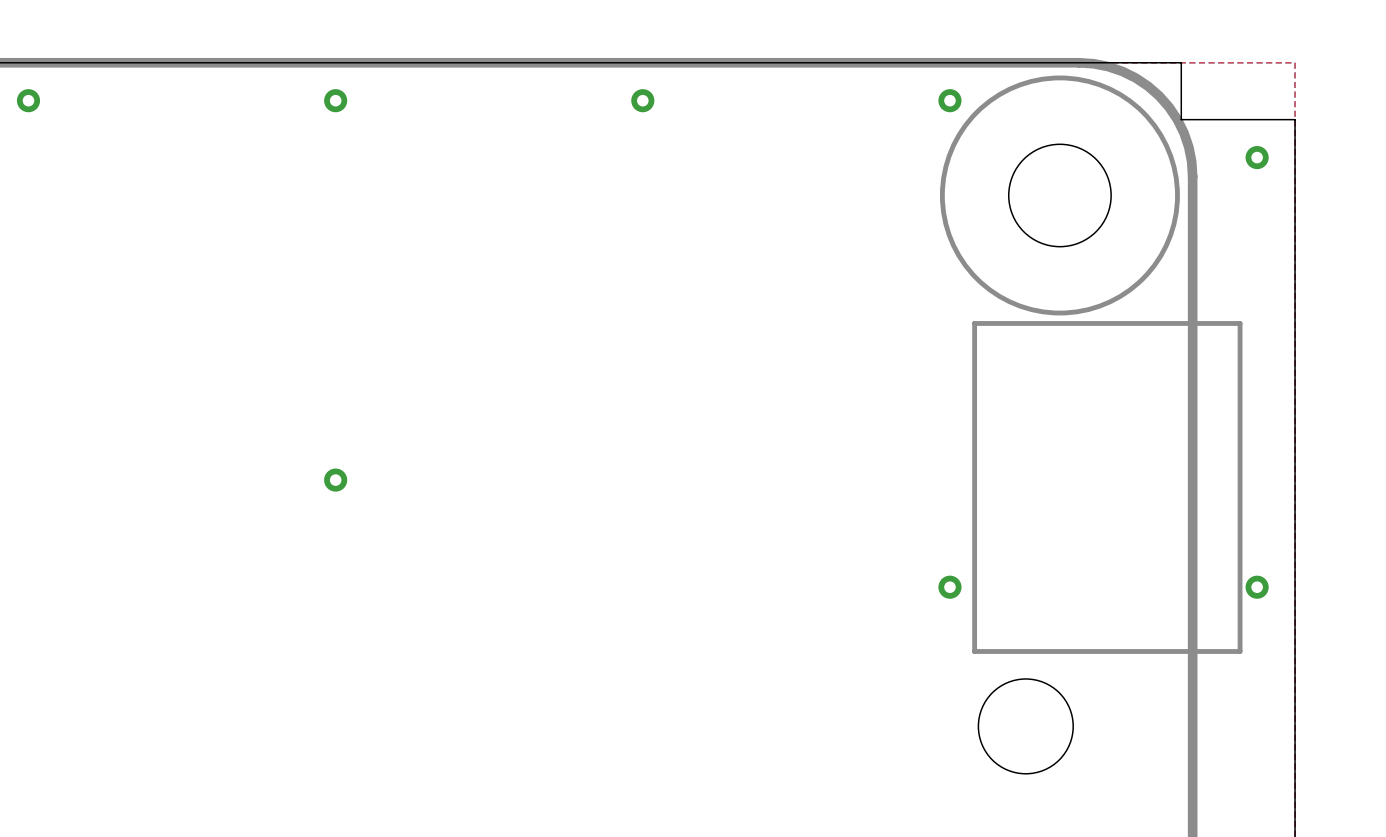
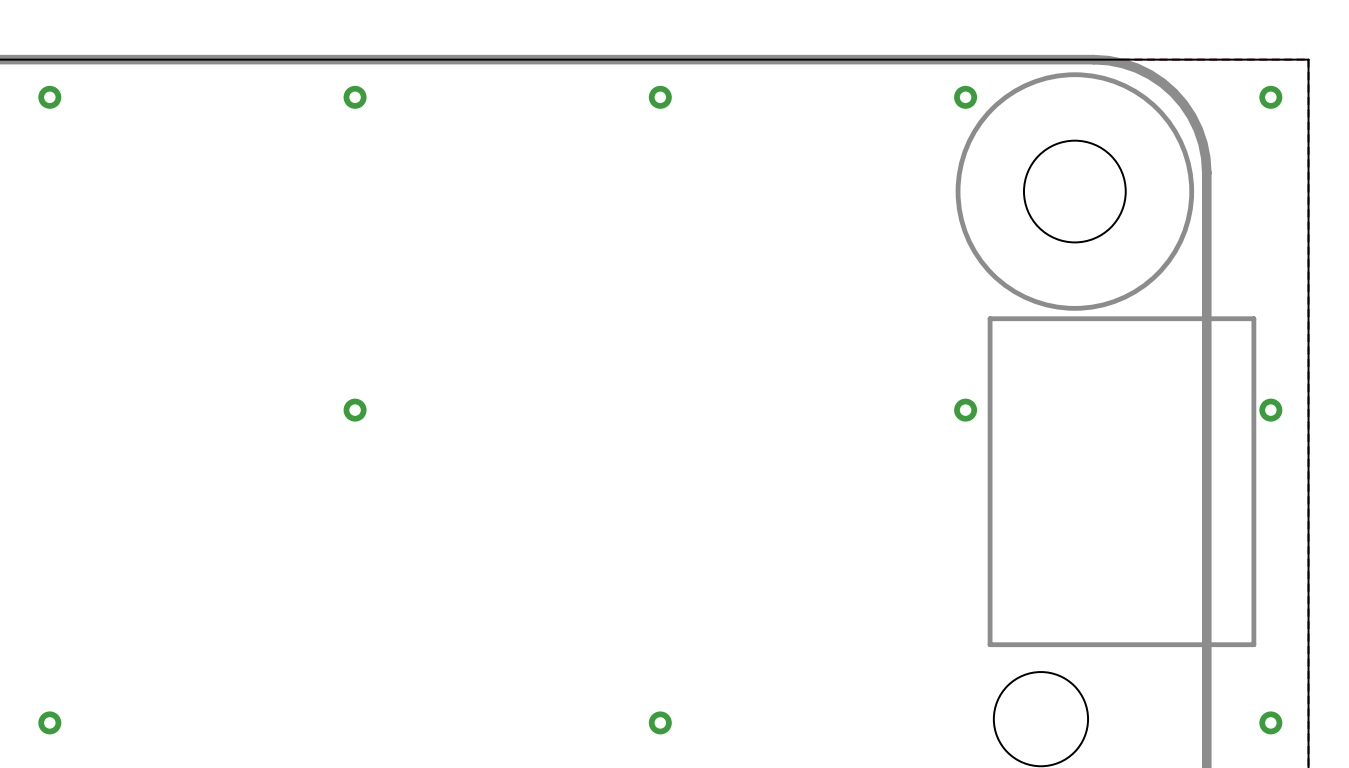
board edge: (1181, 62) (1181, 119) (1295, 119) -> (1195, 59) (1308, 59) (1308, 116)
via position: (1257, 157) -> (1270, 97)
via: none -> (965, 410)
via: none -> (1270, 410)
via position: (335, 480) -> (355, 410)
via: (949, 587) -> none
via: (1257, 587) -> none
via: none -> (49, 722)
via: none -> (660, 722)
via: none -> (1270, 722)

